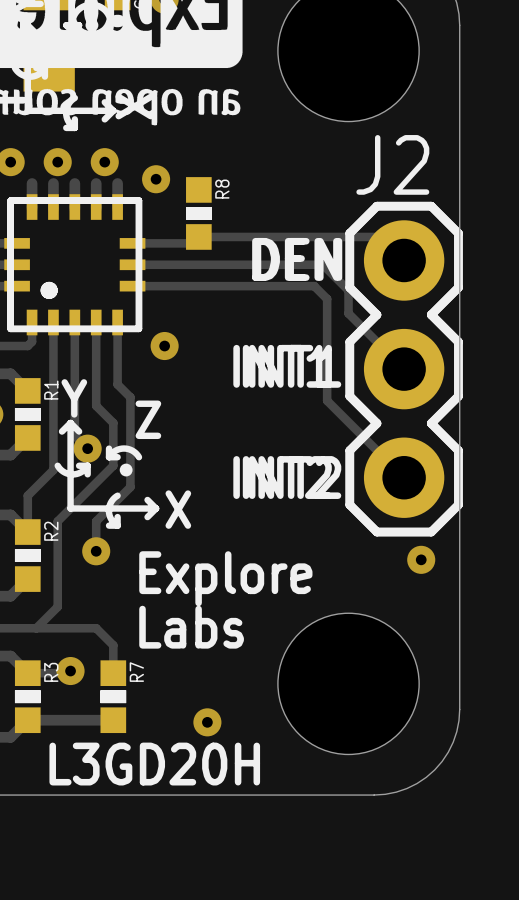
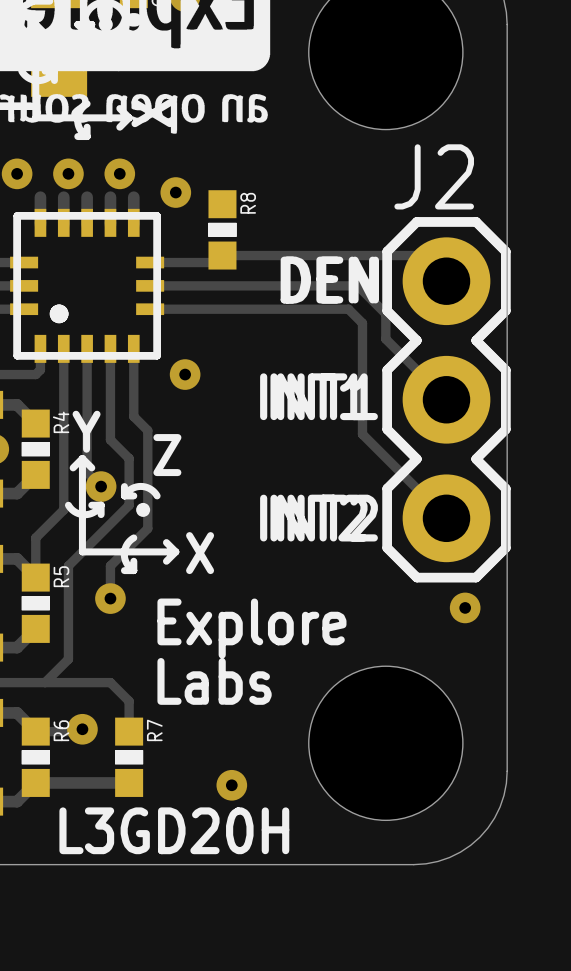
R1 name: R1 (51, 390) -> R4 (61, 422)
R2 name: R2 (51, 531) -> R5 (61, 576)
R3 name: R3 (51, 672) -> R6 (61, 730)

